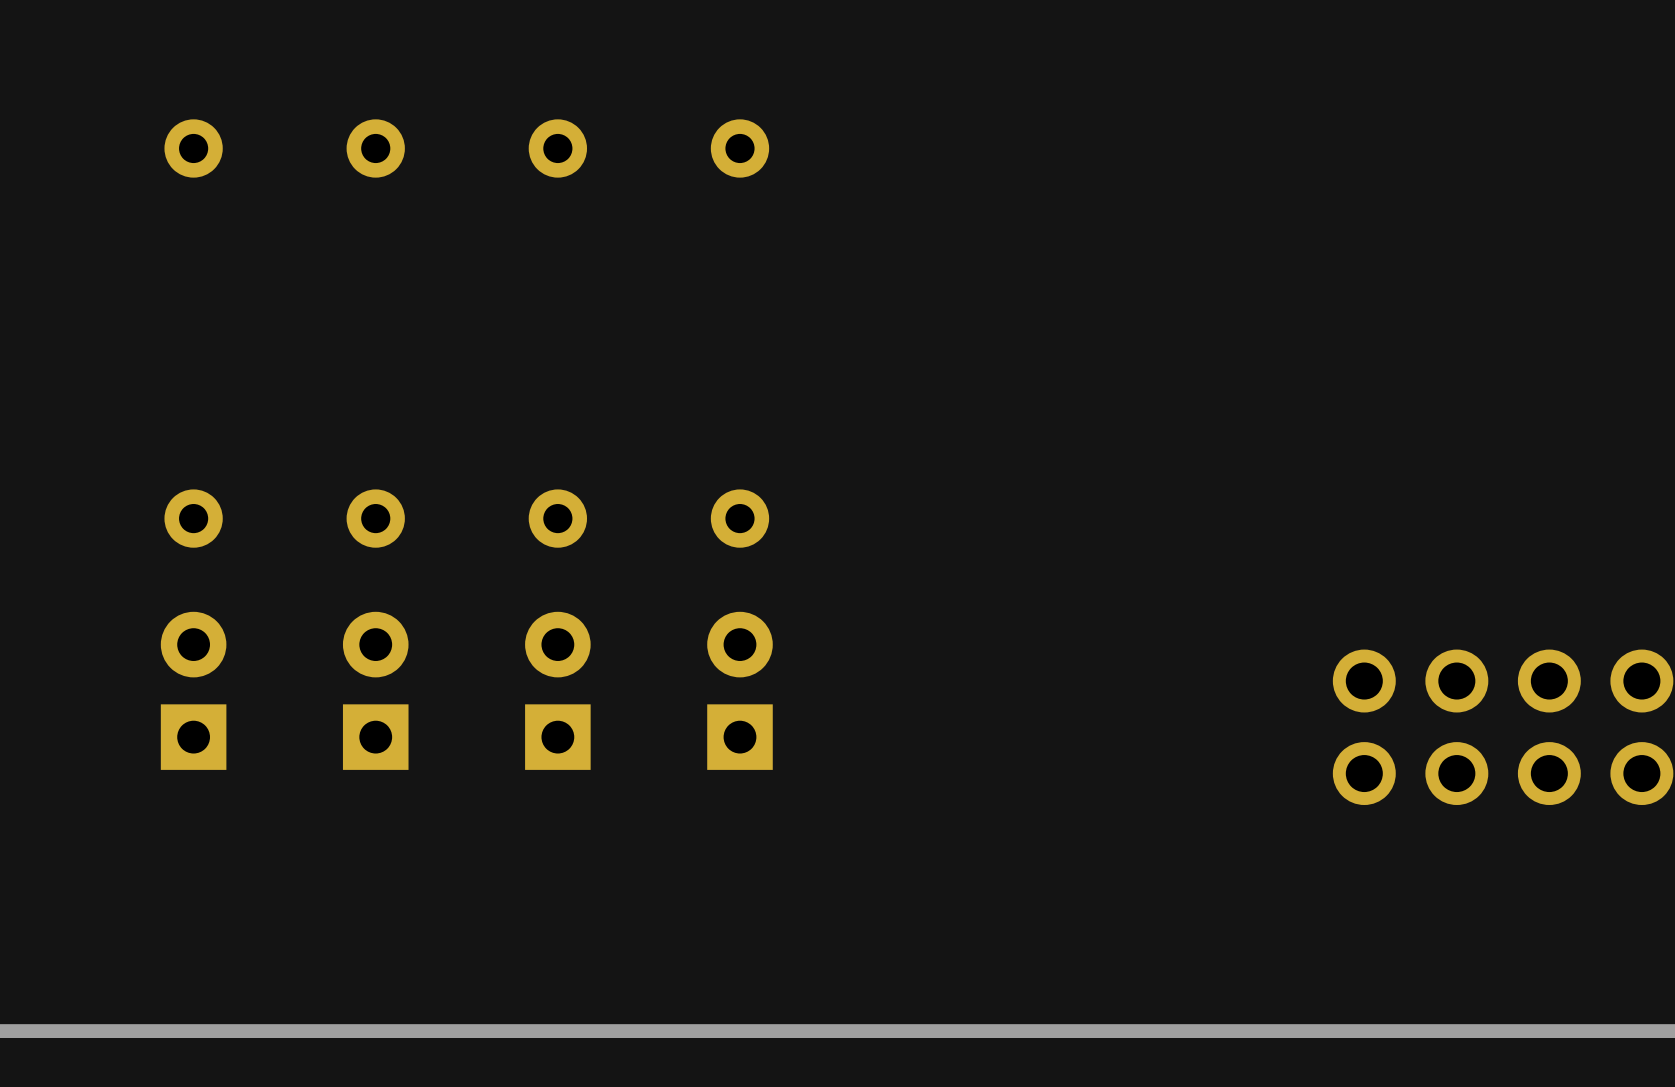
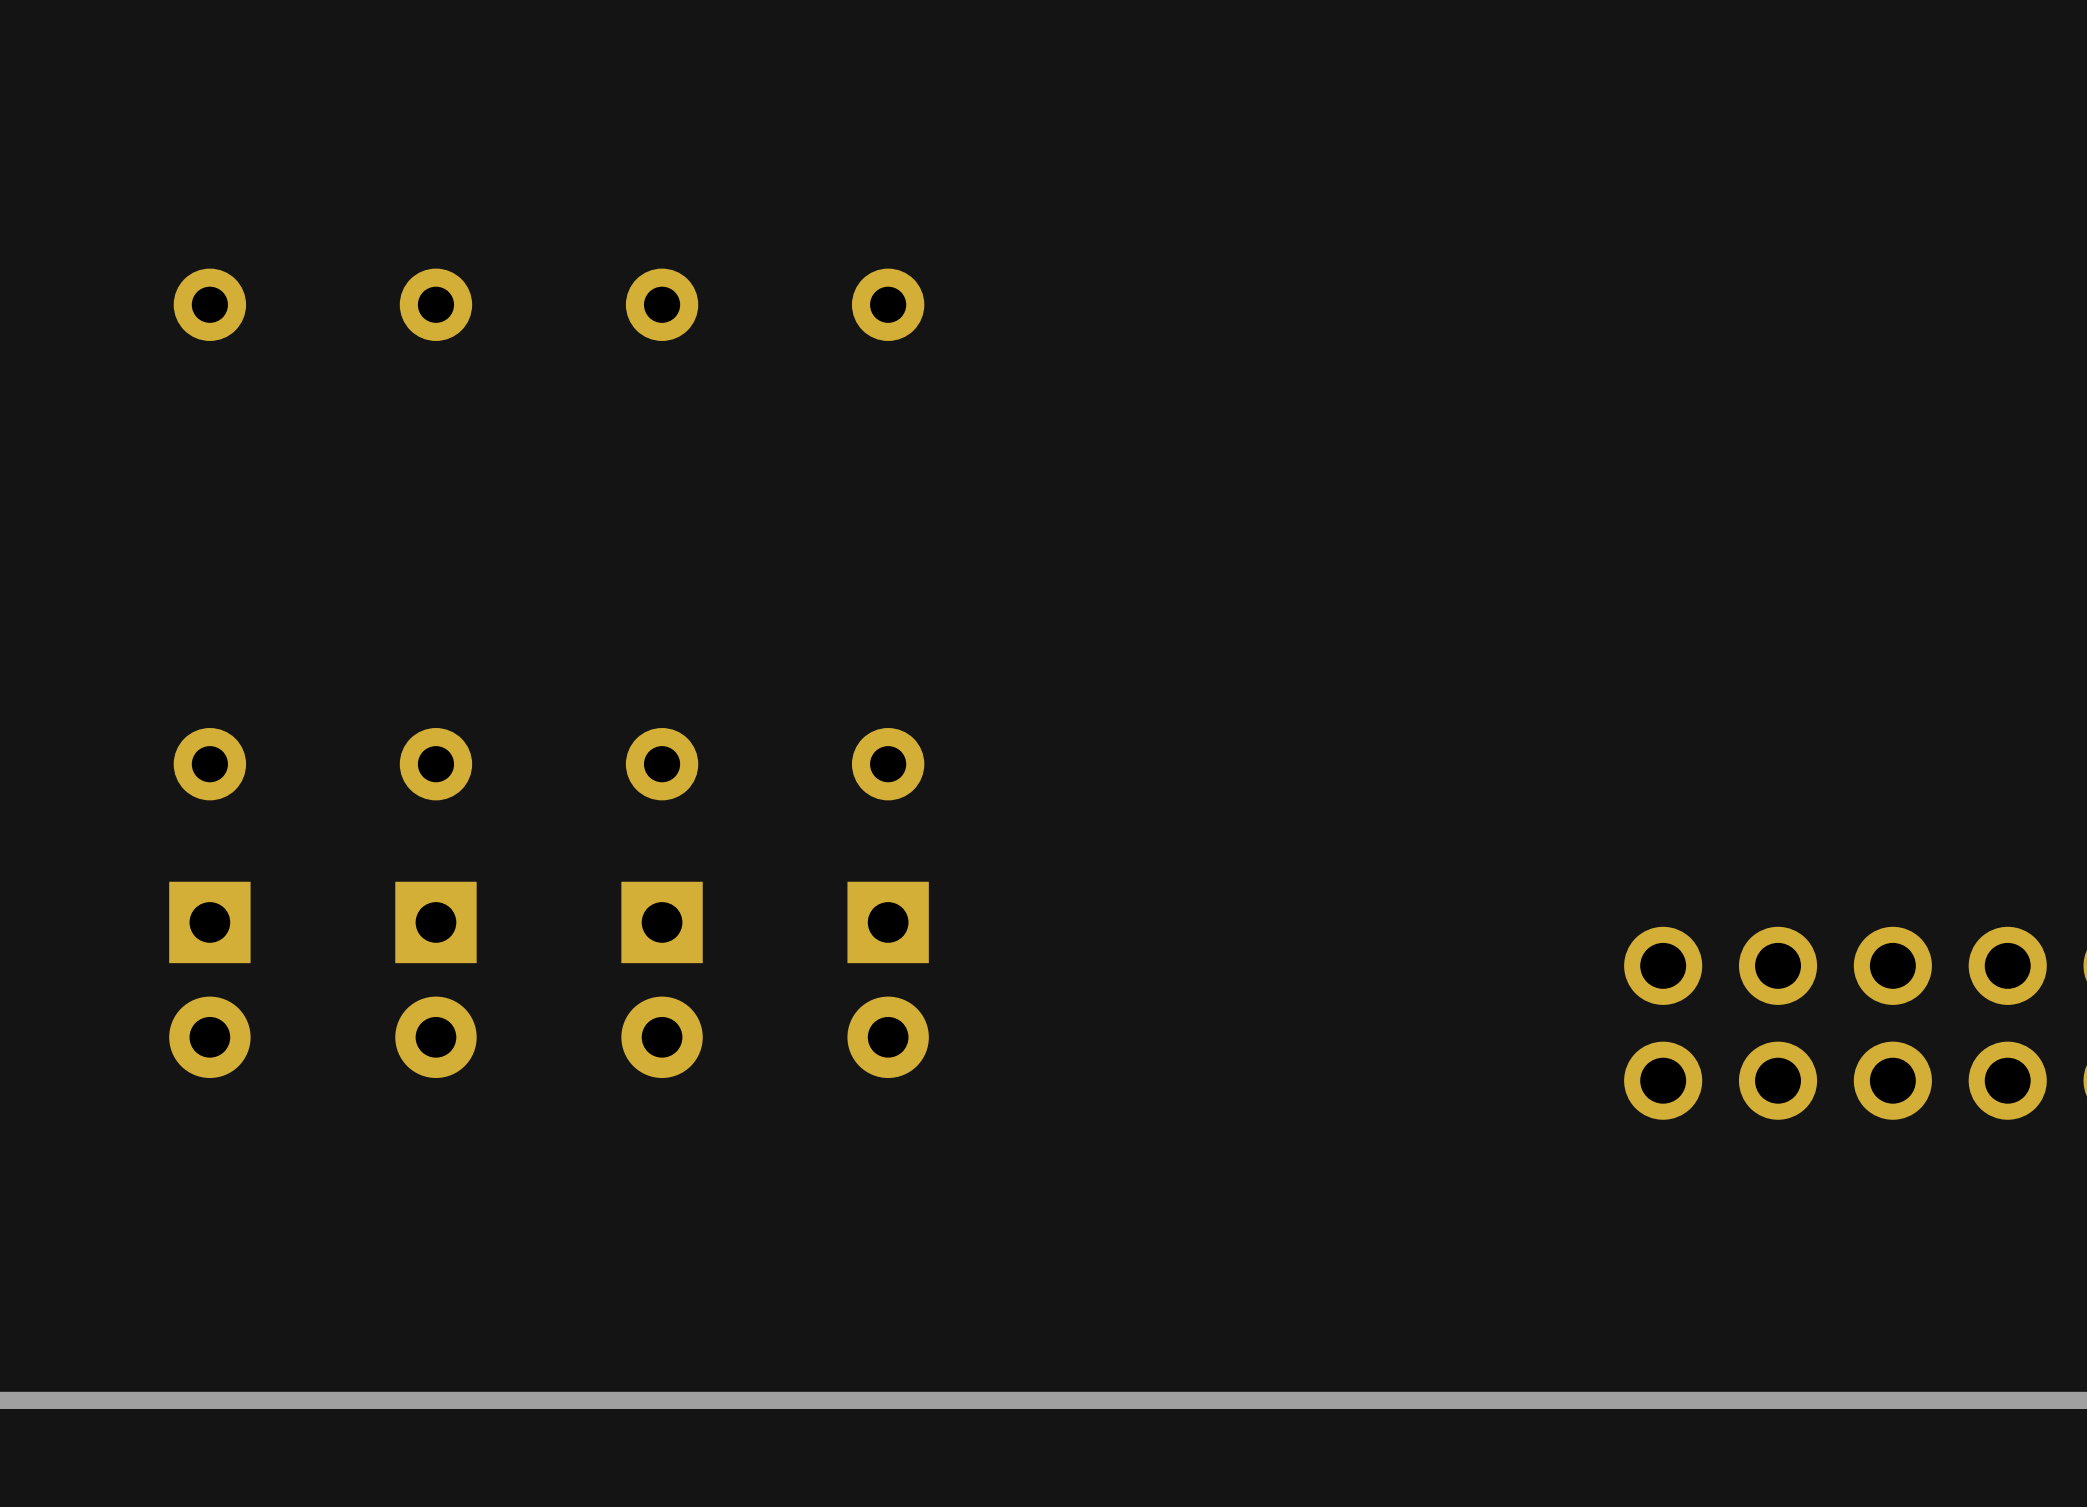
part rotation: 0° (193, 690) -> 180° (209, 979)
part rotation: 0° (375, 690) -> 180° (435, 979)
part rotation: 0° (557, 690) -> 180° (662, 979)
part rotation: 0° (739, 690) -> 180° (888, 979)

